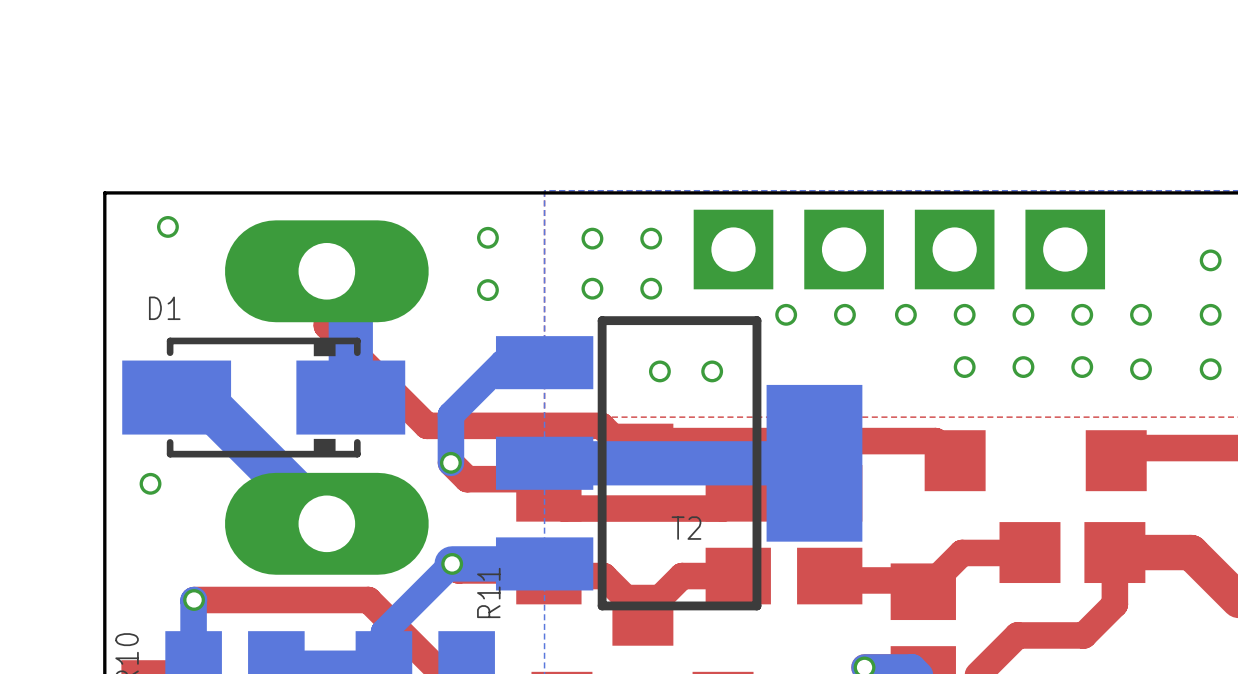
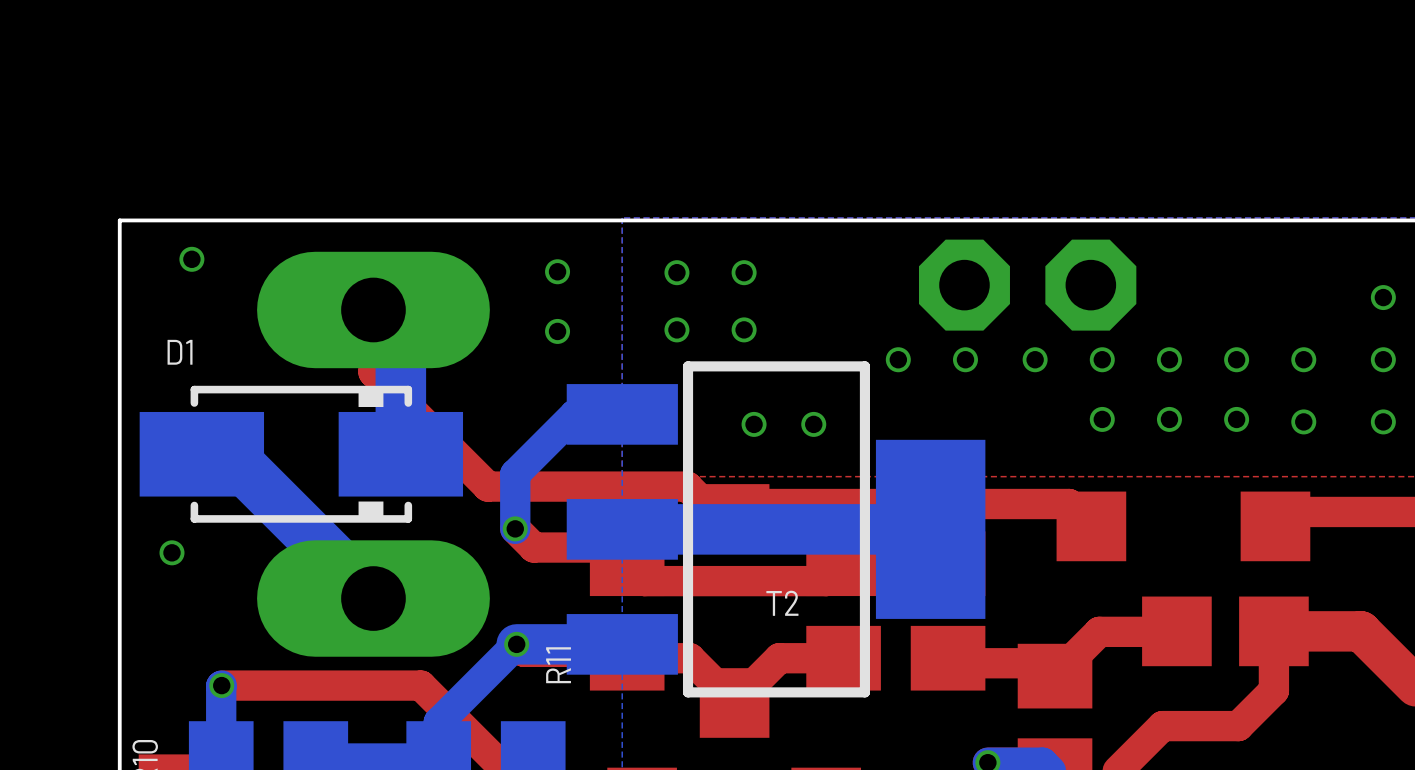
part footprint: [693, 209, 1106, 290] -> [919, 239, 1137, 331]

